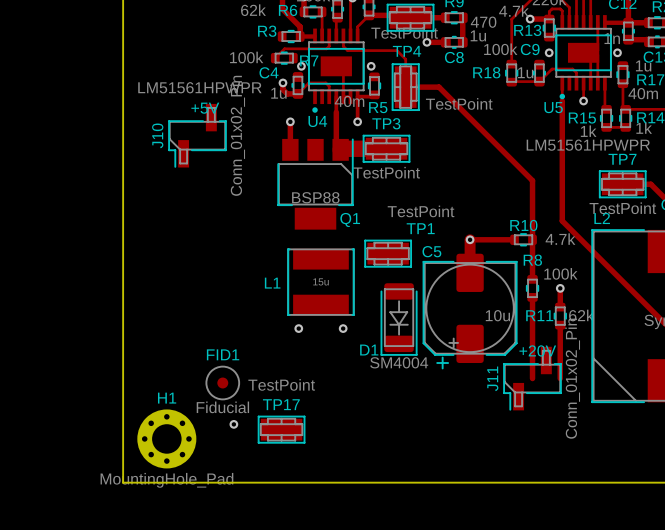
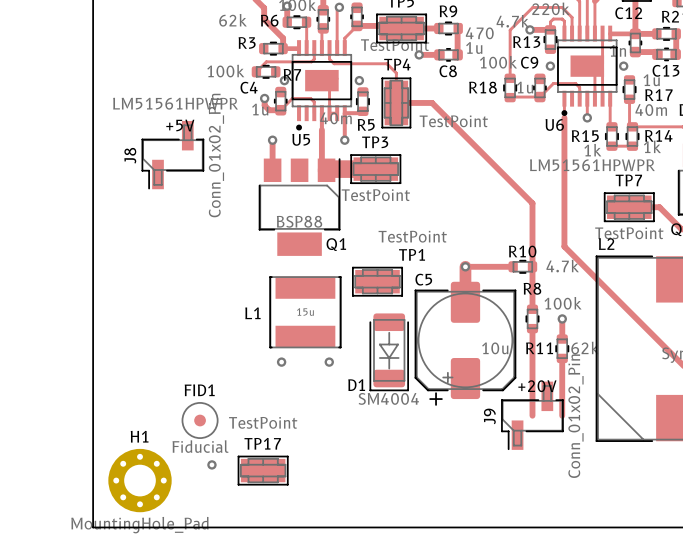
U5 name: U5 (553, 107) -> U6 (554, 124)
U4 name: U4 (317, 121) -> U5 (301, 139)
J10 name: J10 (157, 135) -> J8 (130, 155)
J11 name: J11 (492, 378) -> J9 (489, 416)

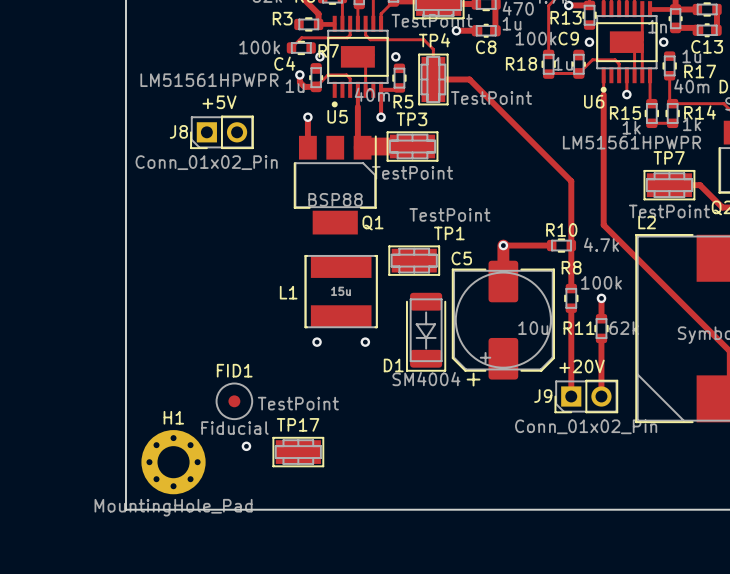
J8 footprint: [141, 120, 205, 190] -> [190, 115, 254, 149]
J8 value position: Conn_01x02_Pin (216, 155) -> Conn_01x02_Pin (206, 162)
J9 footprint: [501, 381, 564, 450] -> [554, 379, 618, 414]
J9 value position: Conn_01x02_Pin (575, 416) -> Conn_01x02_Pin (586, 426)

